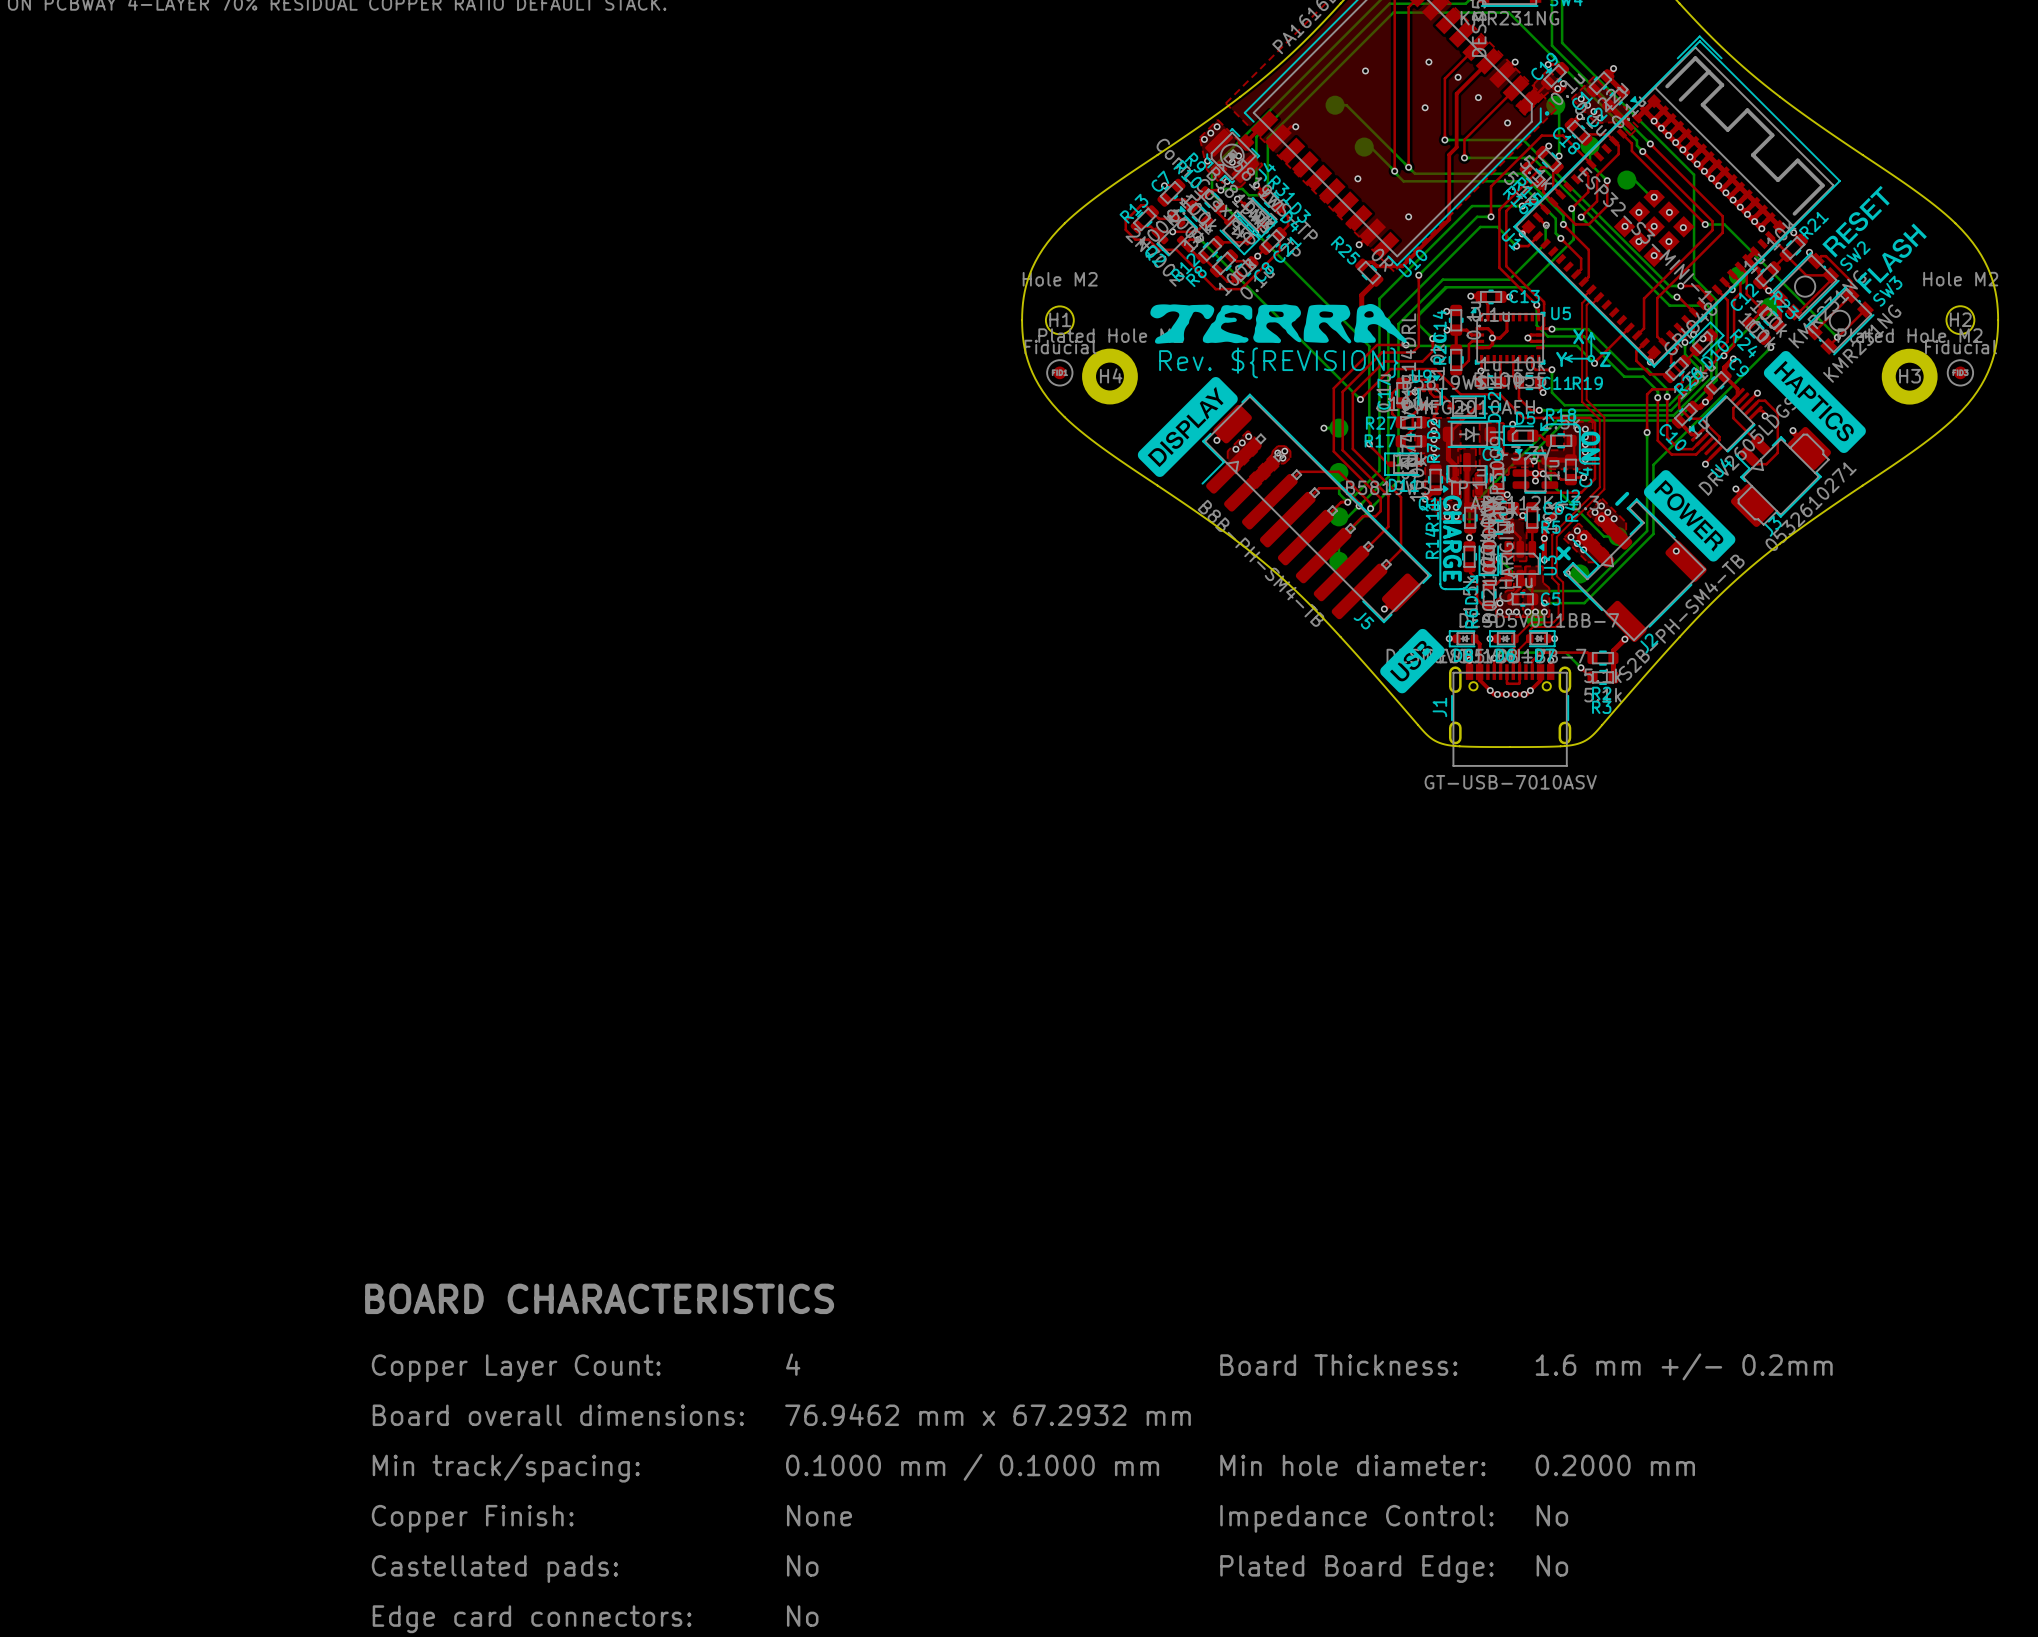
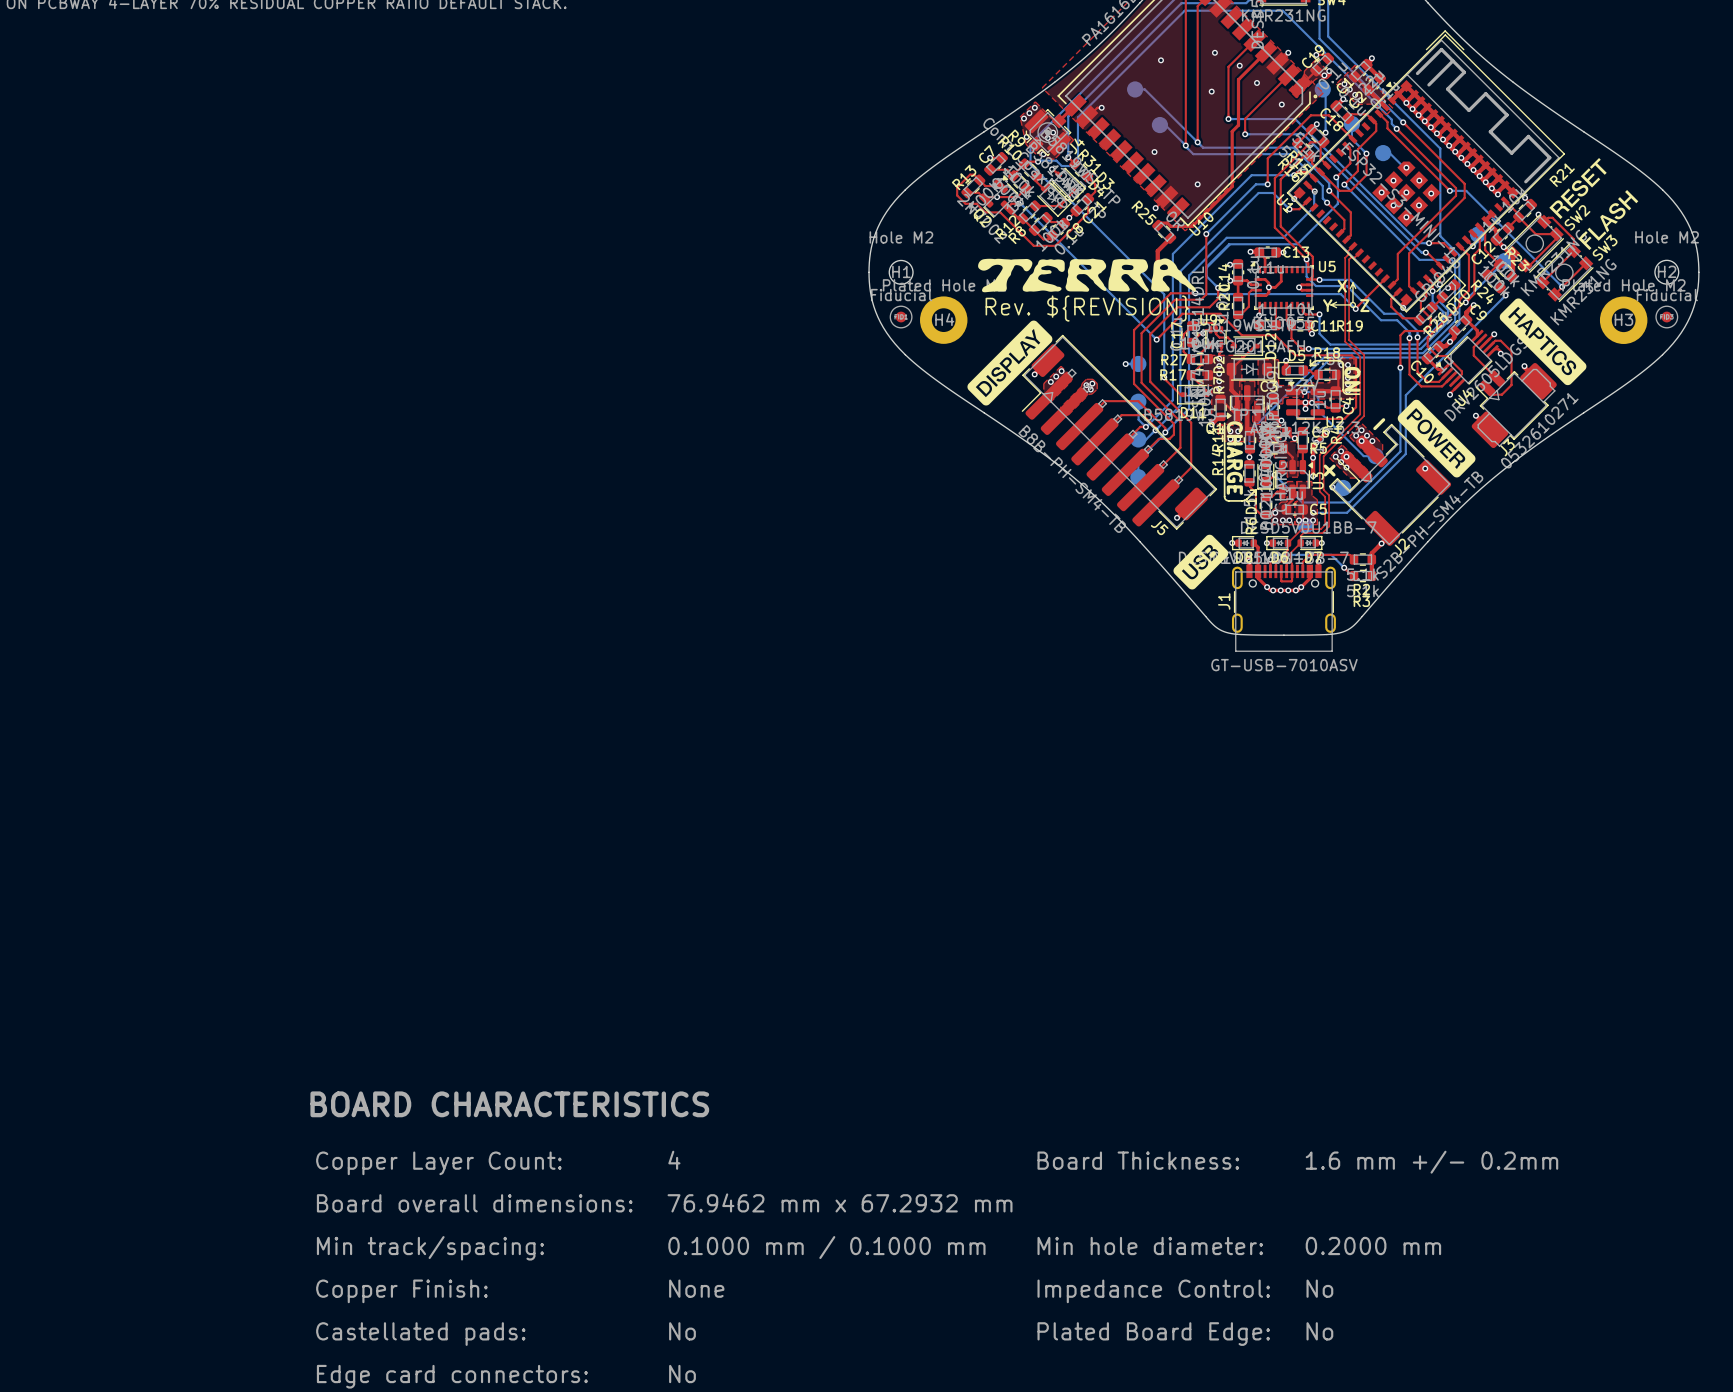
R21 name position: R21 (1813, 225) -> R21 (1562, 175)

